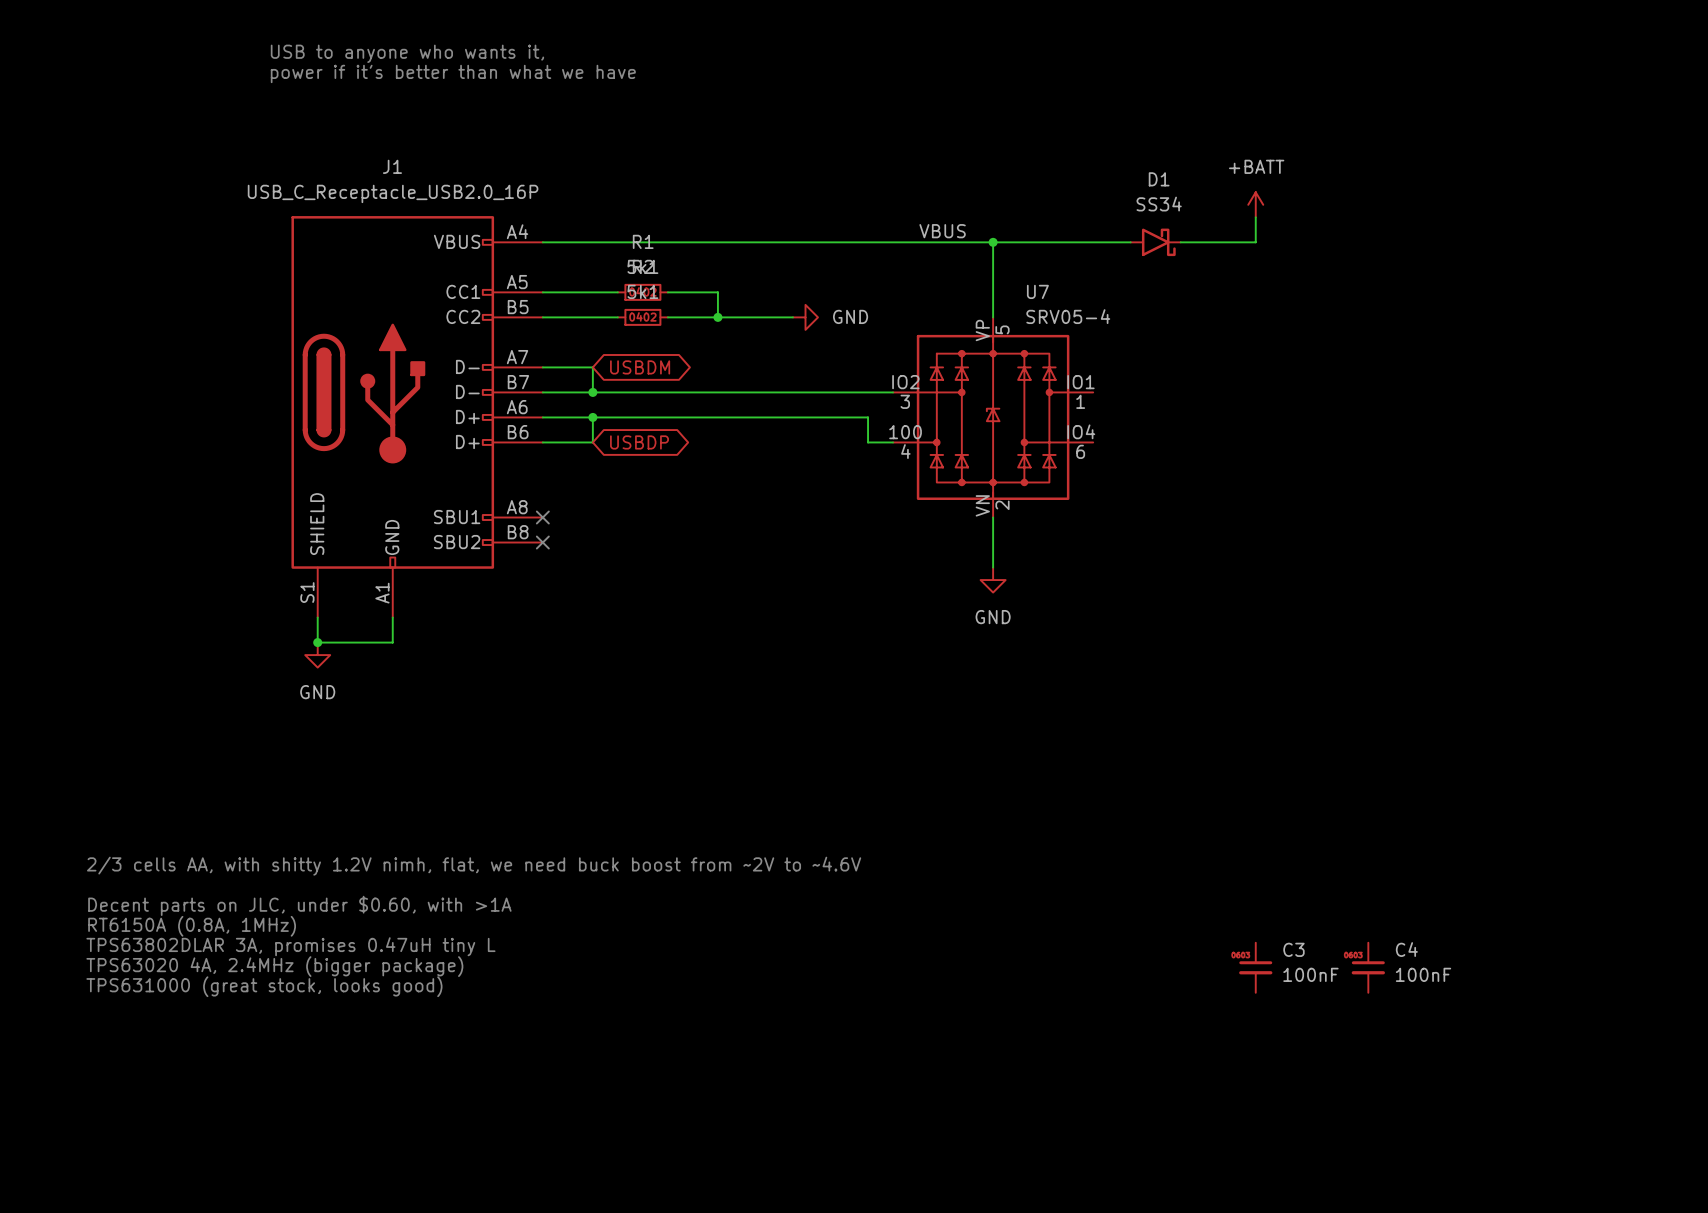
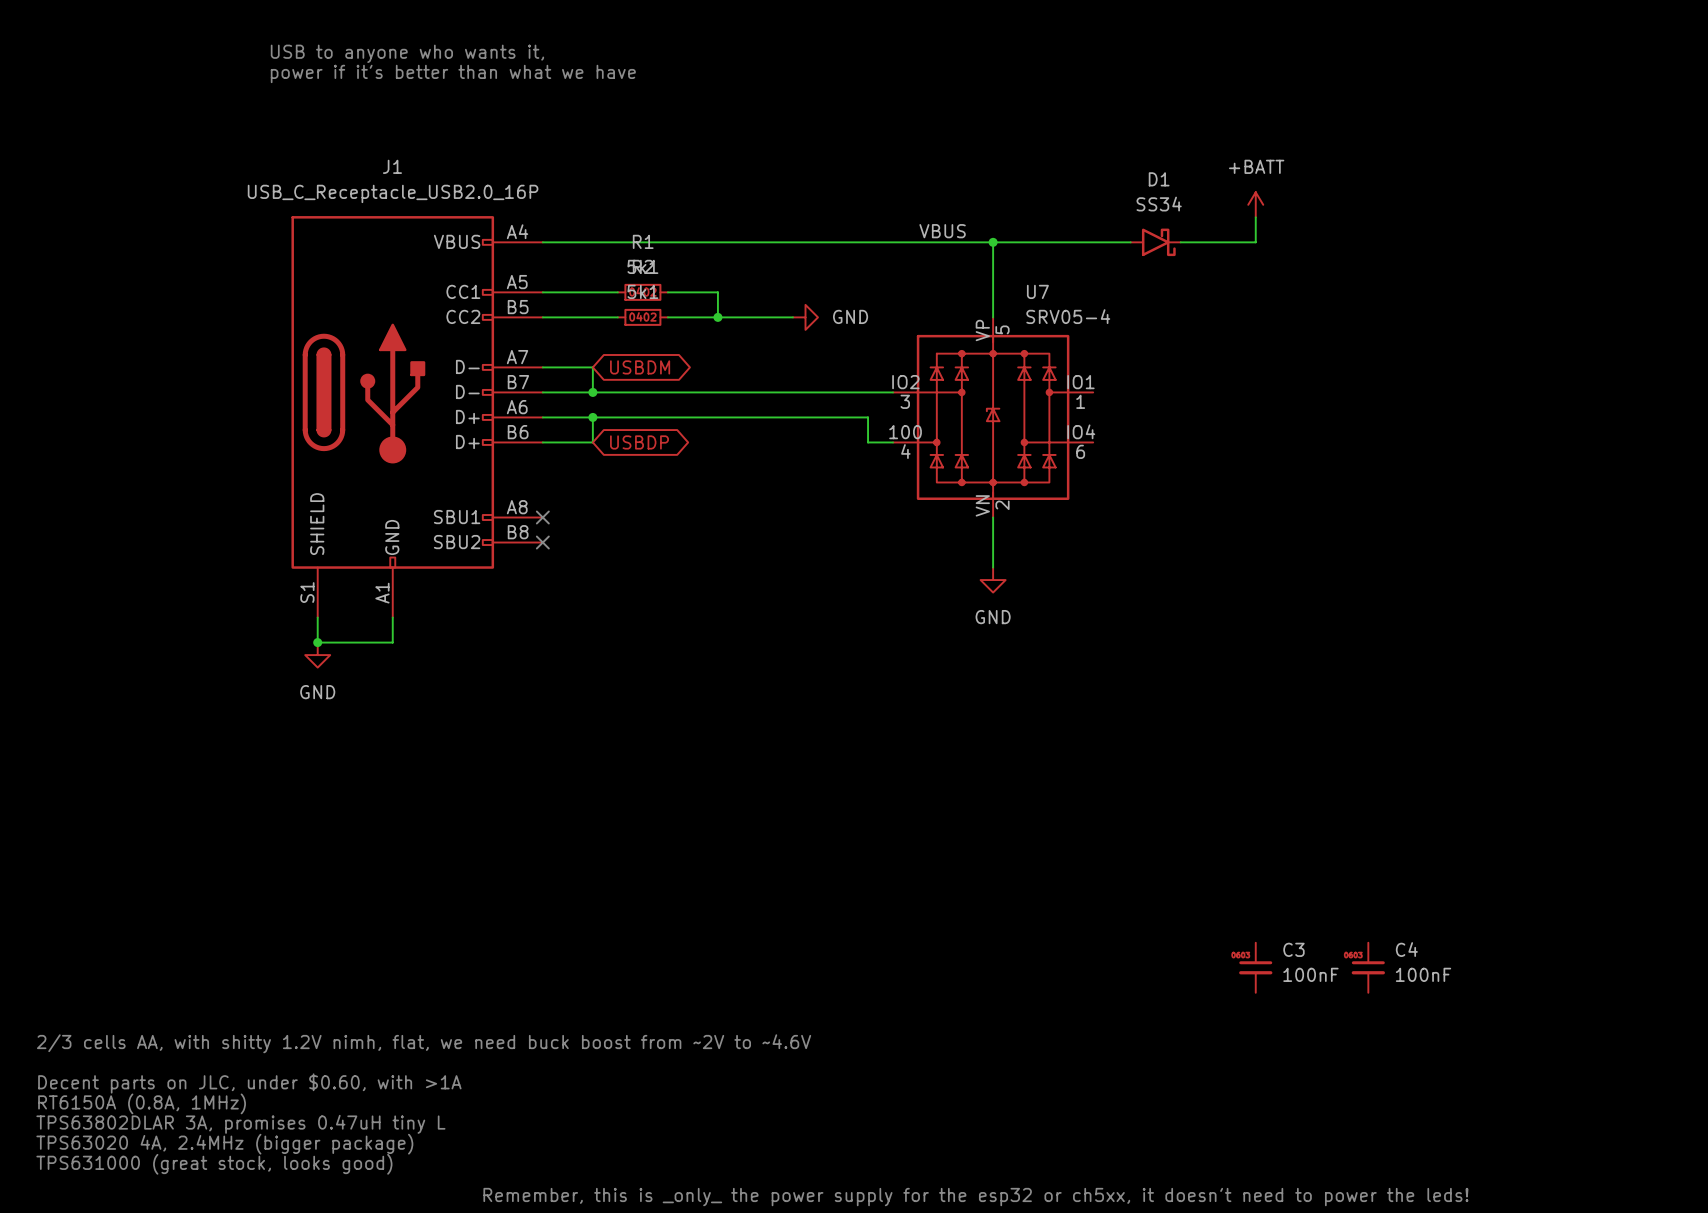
text position: 2/3 cells AA, with shitty 1.2V nimh, flat, we need buck boost from ~2V to ~4.6V (474, 866) -> 2/3 cells AA, with shitty 1.2V nimh, flat, we need buck boost from ~2V to ~4.6V (424, 1043)
text position: Decent parts on JLC, under $0.60, with >1A (299, 905) -> Decent parts on JLC, under $0.60, with >1A (249, 1083)
text position: RT6150A (0.8A, 1MHz) (192, 926) -> RT6150A (0.8A, 1MHz) (142, 1103)
text position: TPS63802DLAR 3A, promises 0.47uH tiny L (290, 946) -> TPS63802DLAR 3A, promises 0.47uH tiny L (240, 1124)
text position: TPS63020 4A, 2.4MHz (bigger package) (274, 966) -> TPS63020 4A, 2.4MHz (bigger package) (224, 1144)
text position: TPS631000 (great stock, looks good) (264, 986) -> TPS631000 (great stock, looks good) (214, 1164)
text: none -> Remember, this is _only_ the power supply for the esp32 or ch5xx, it doesn't need to power the leds! (975, 1197)

